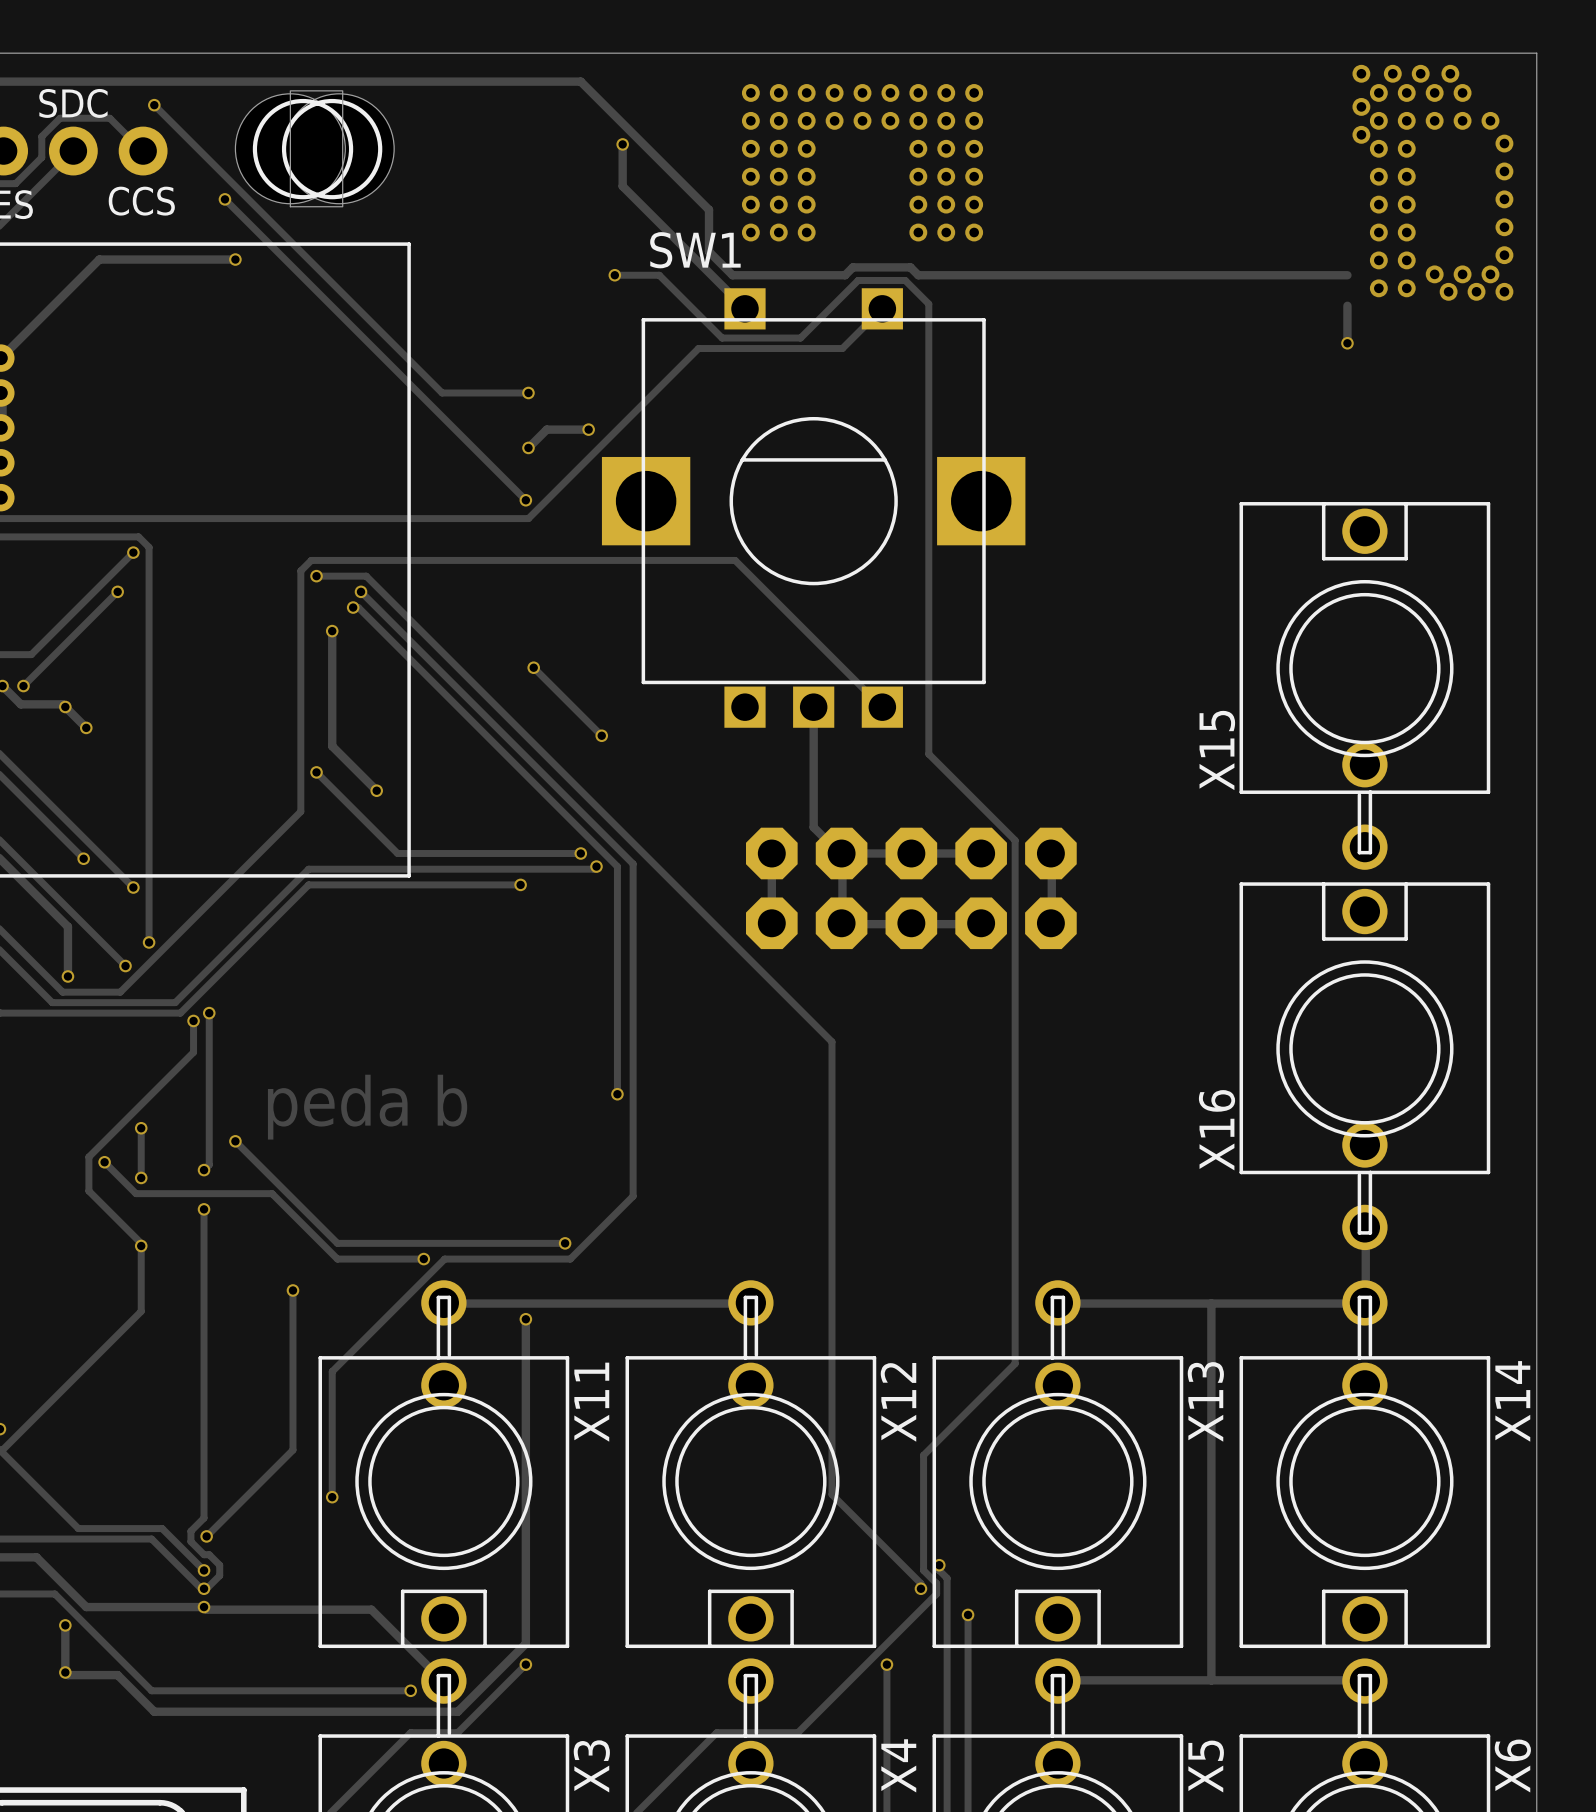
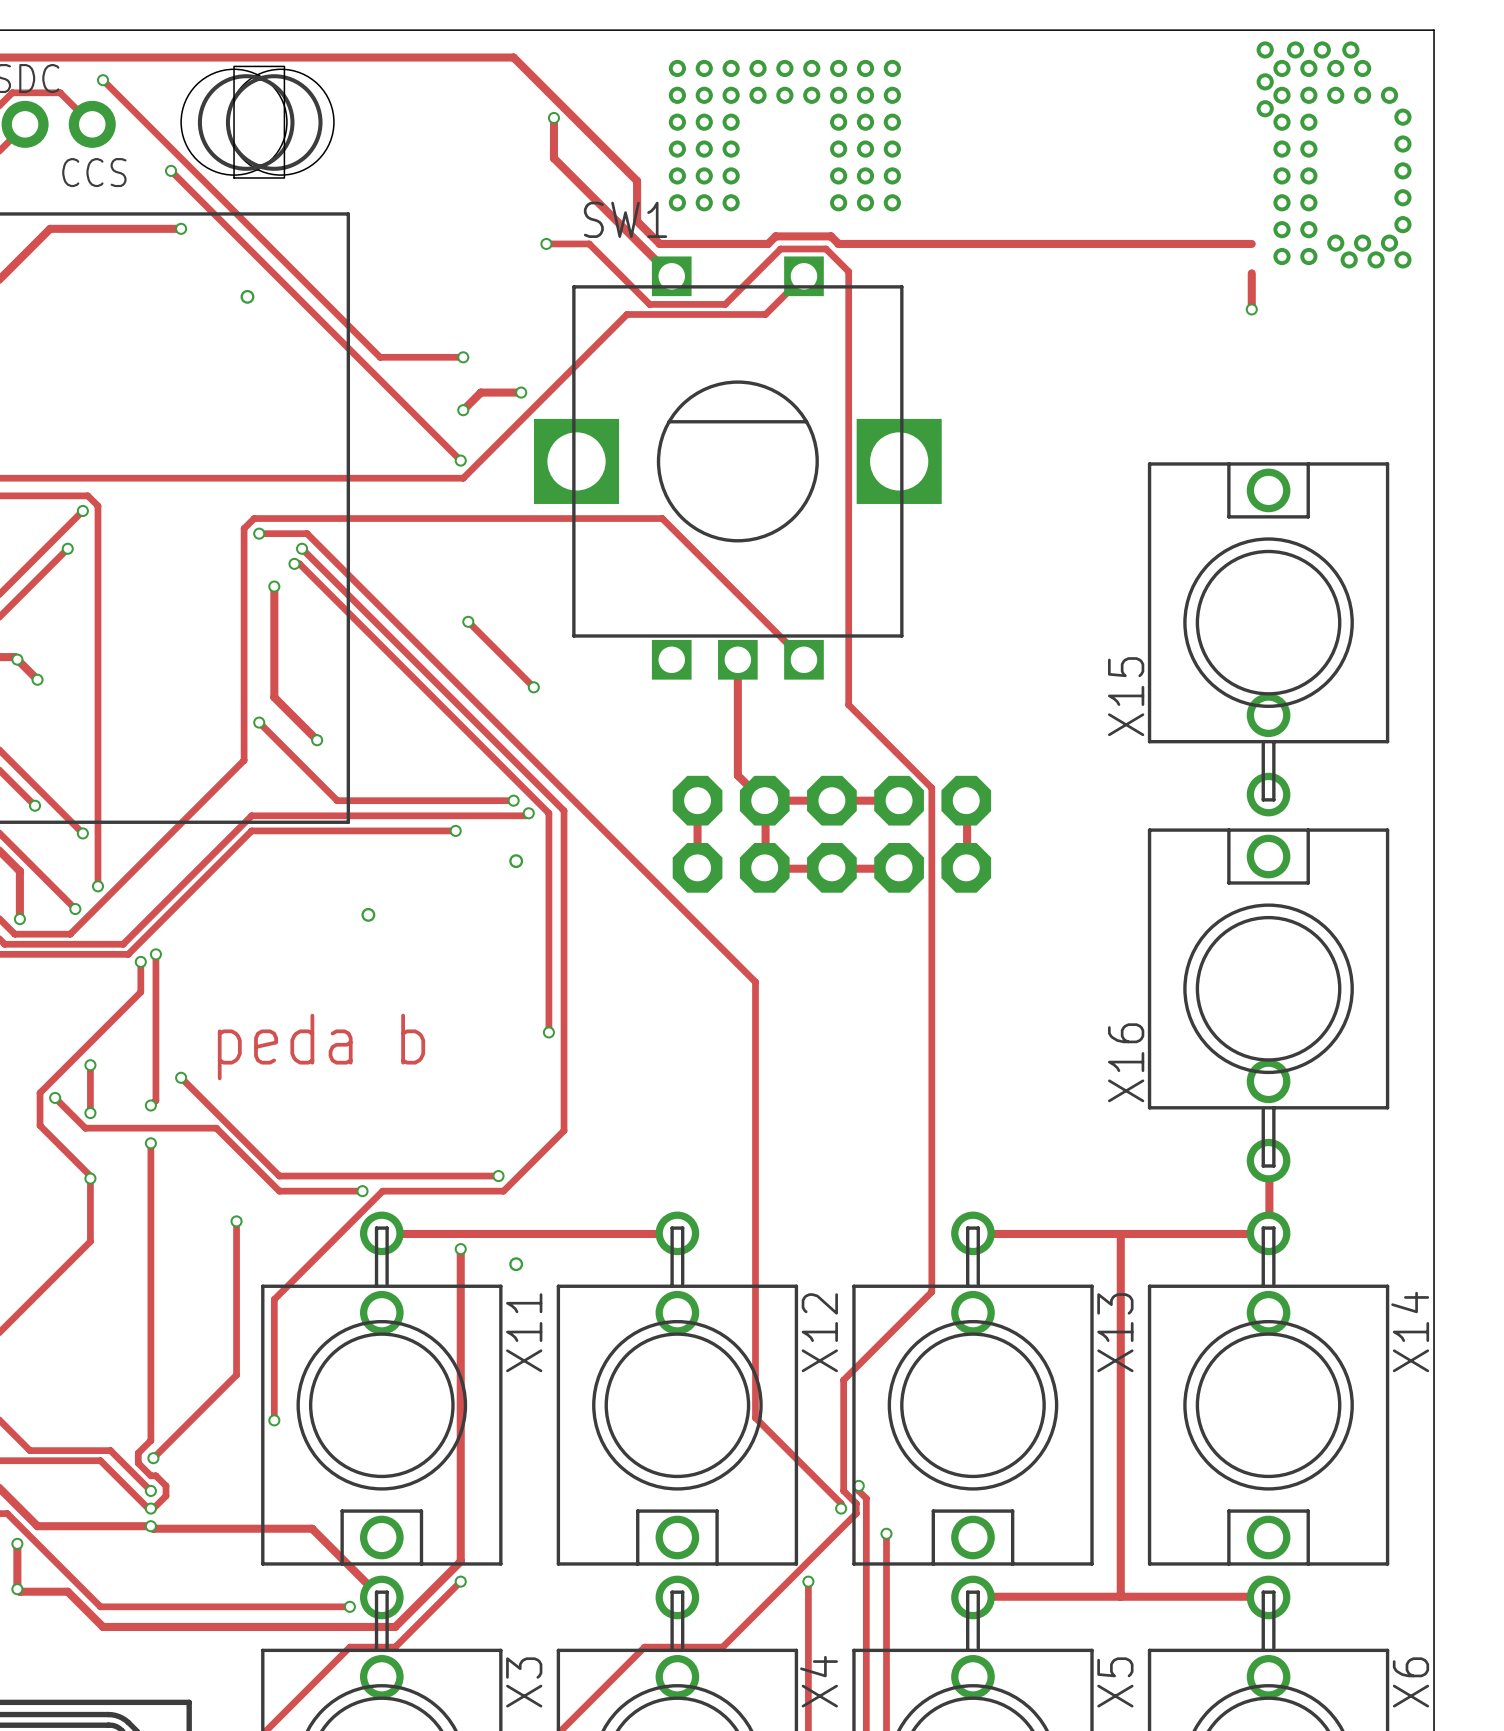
via: none -> (247, 296)
via: none -> (516, 861)
via: none -> (368, 914)
via: none -> (516, 1264)

